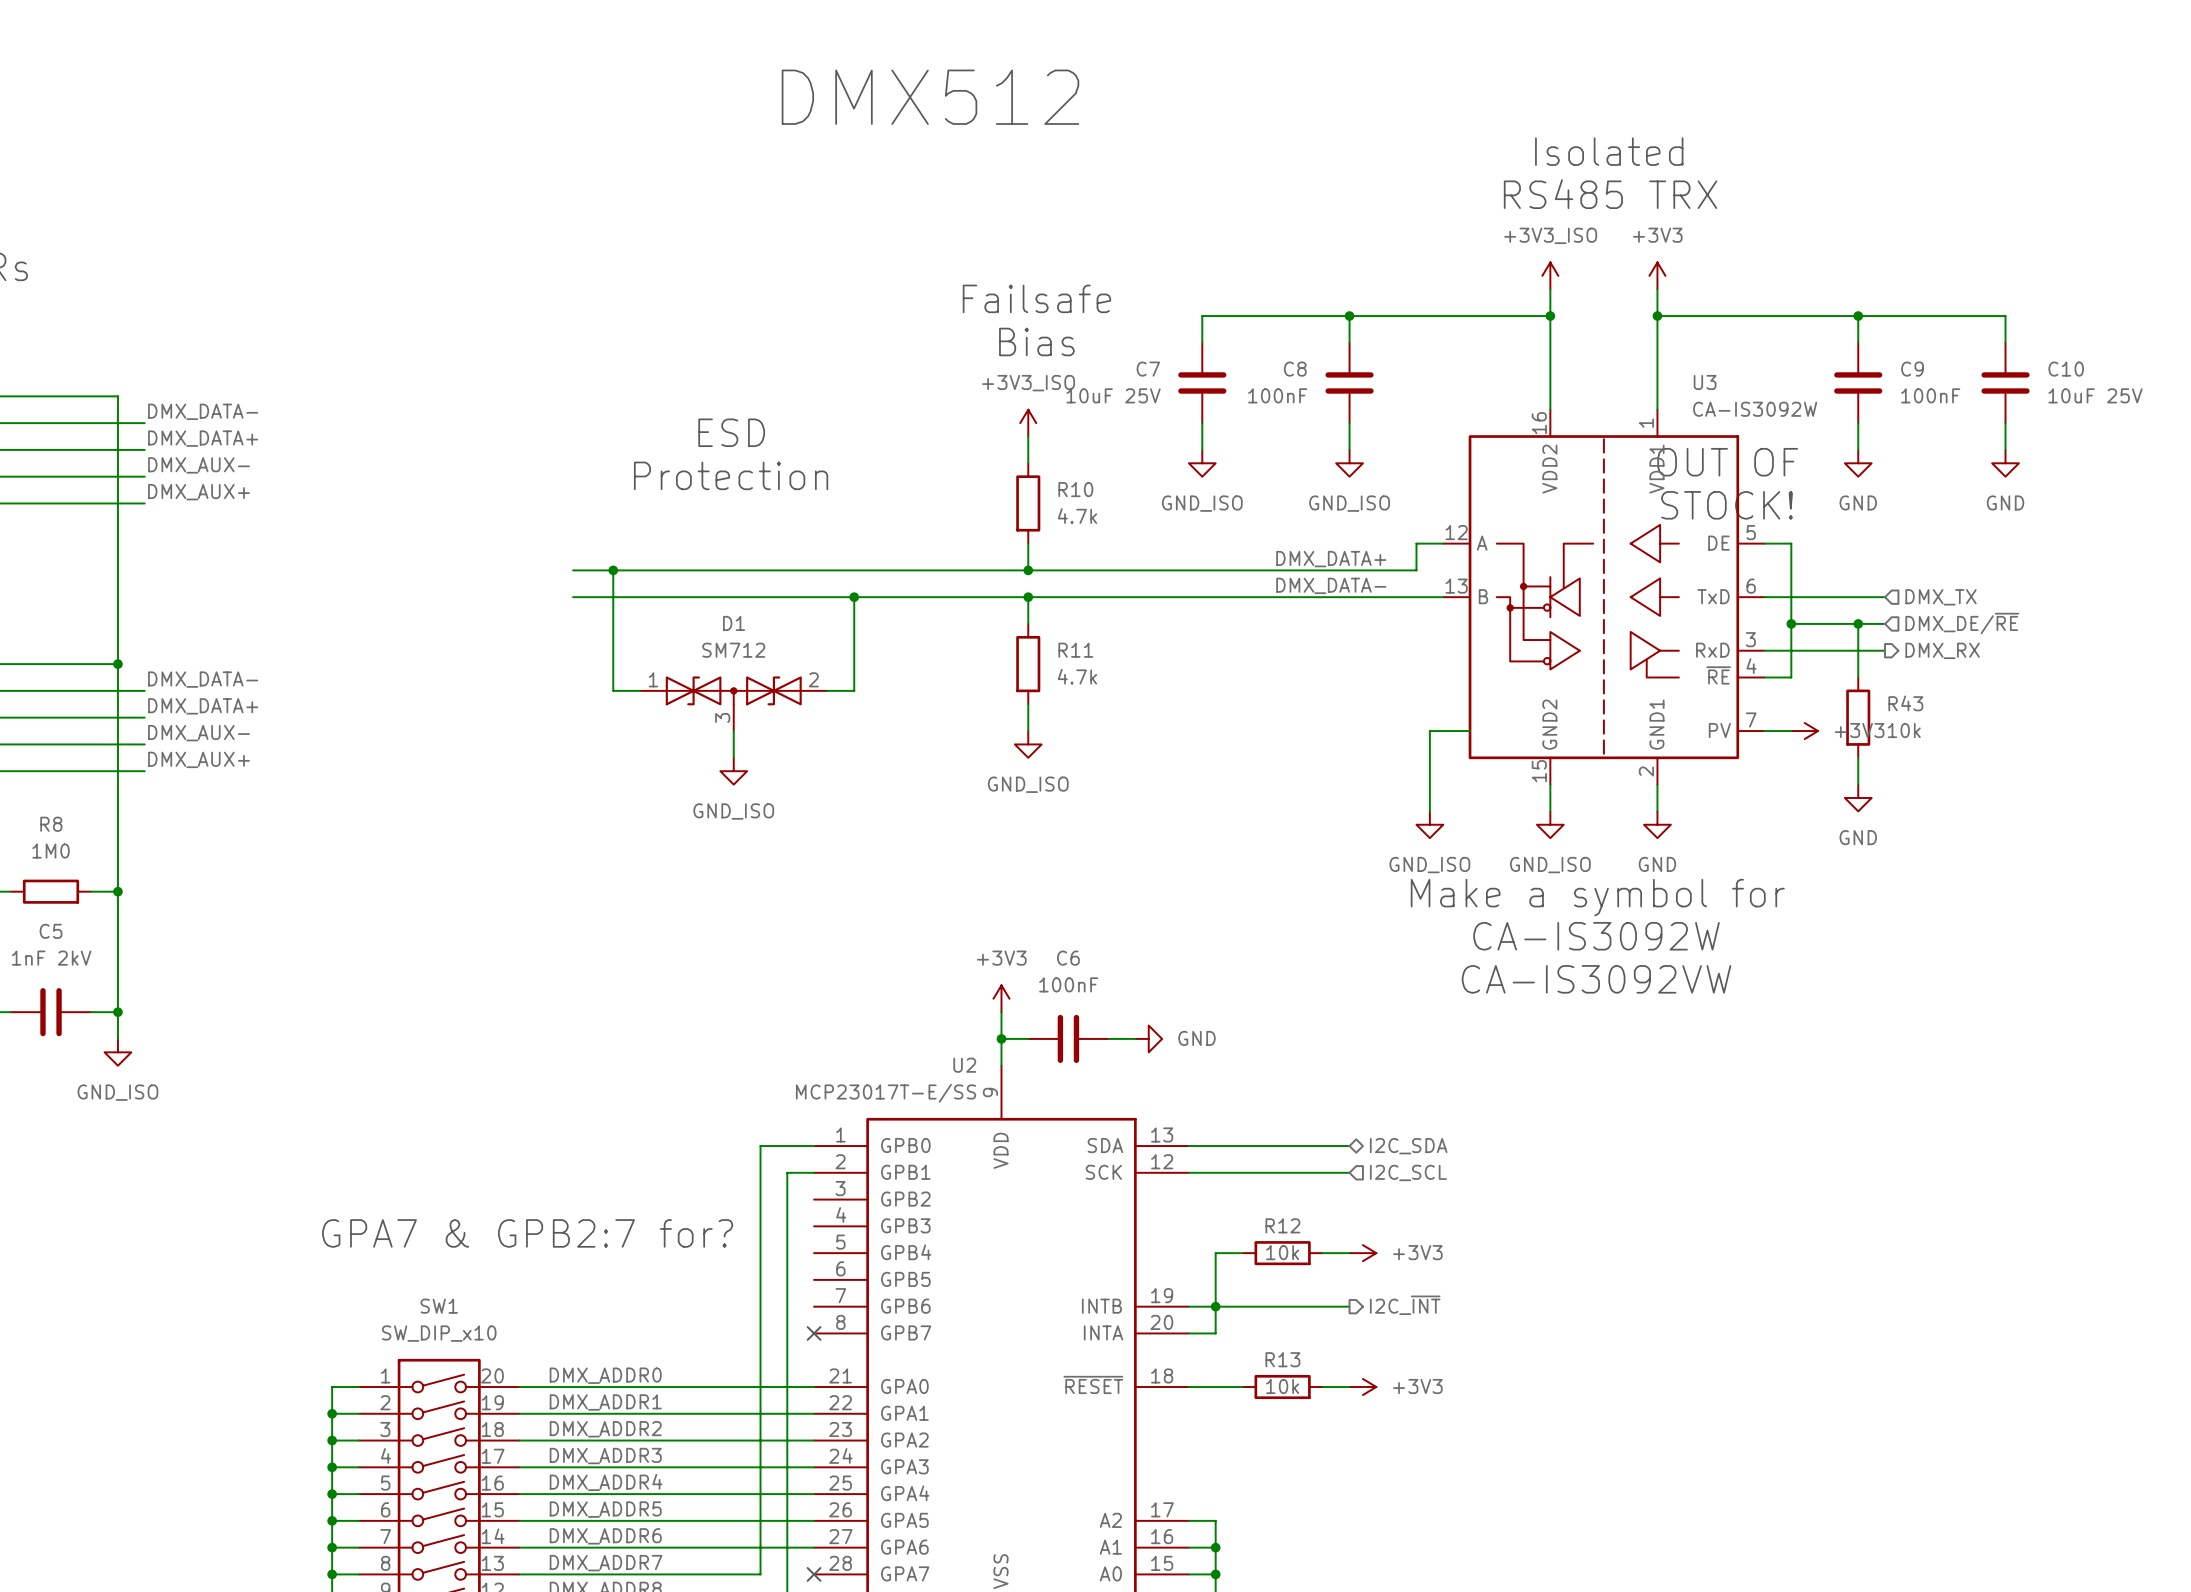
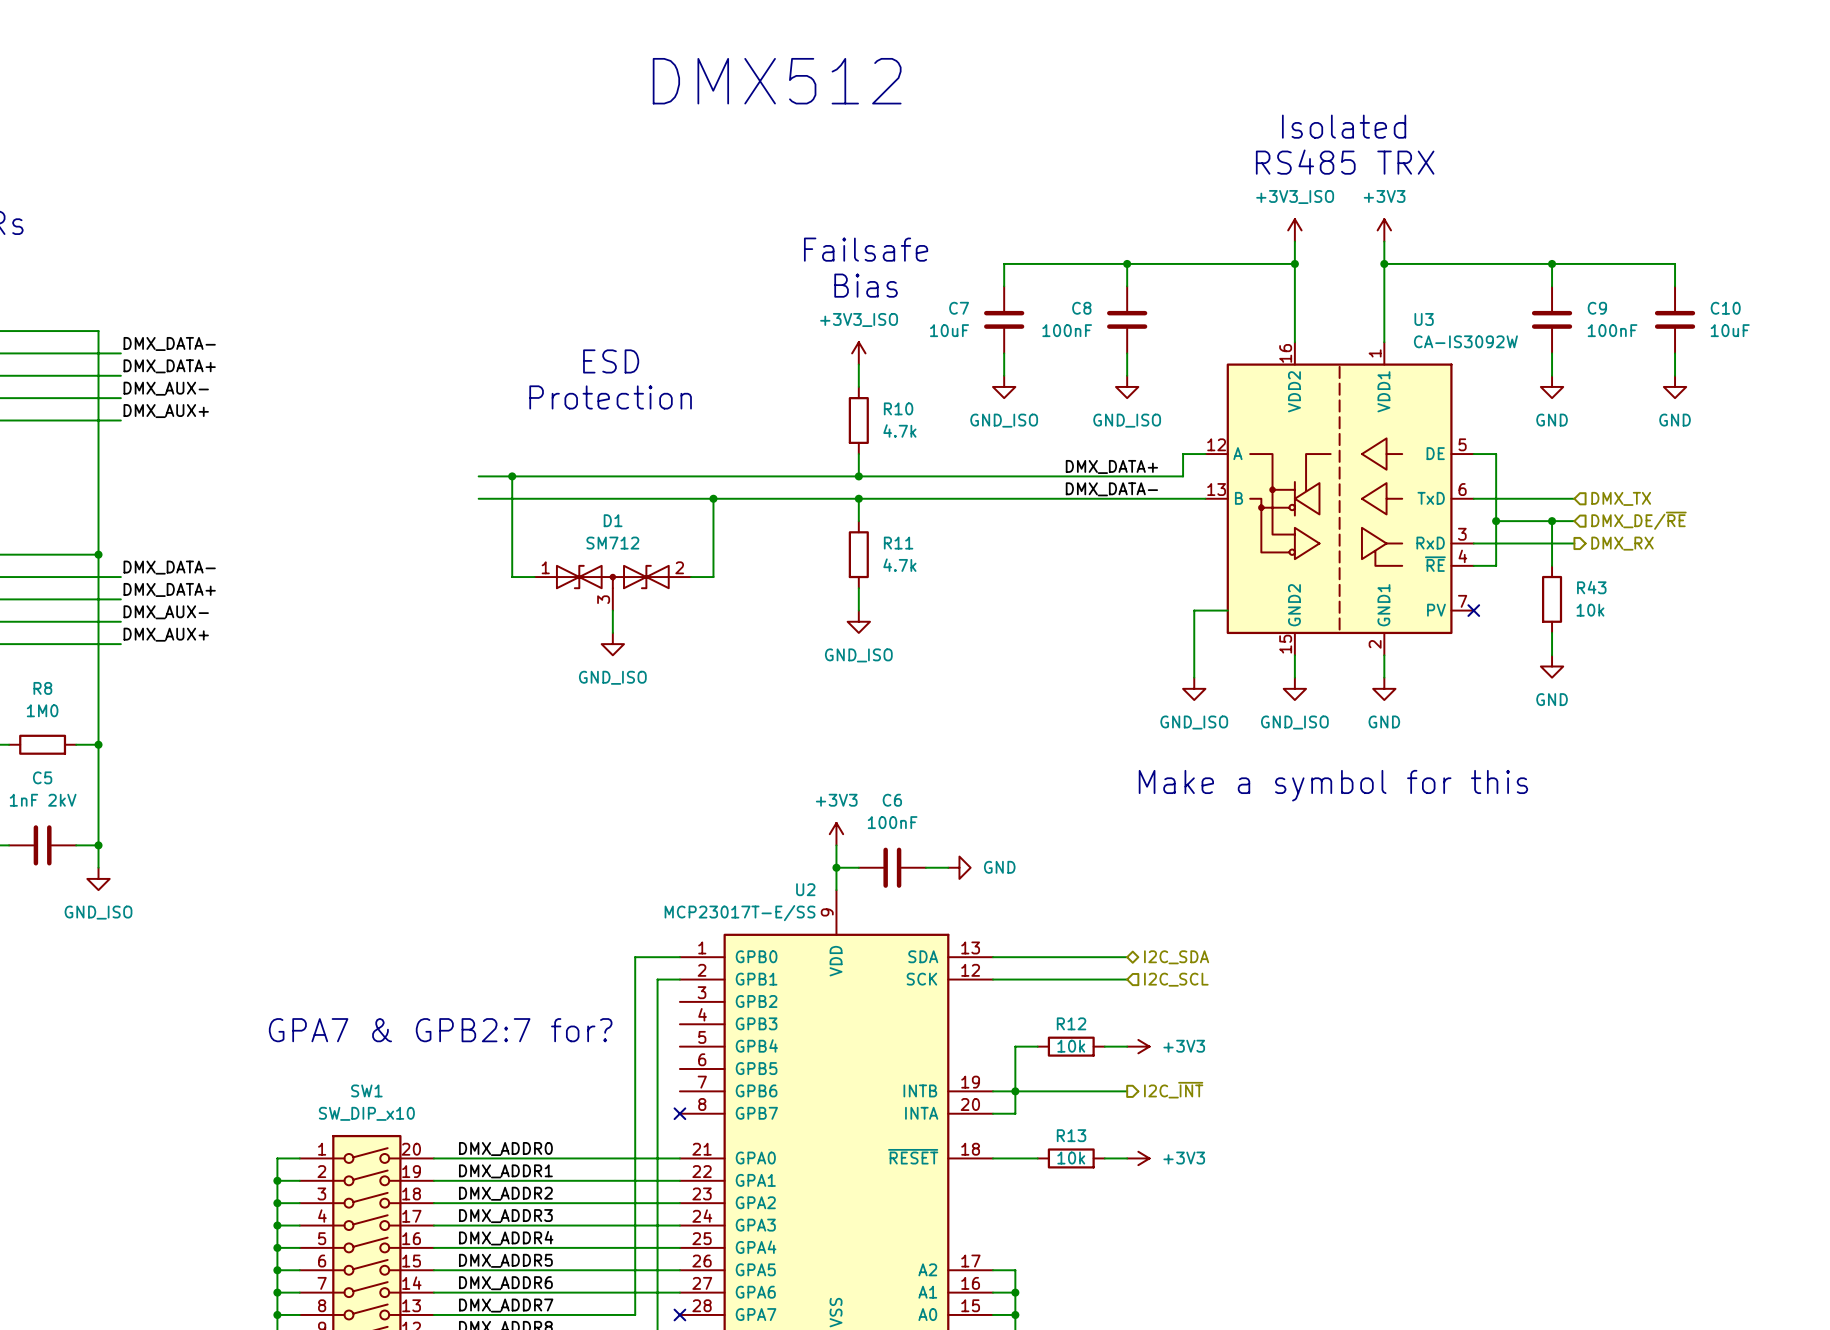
C7 value: 10uF 25V (1113, 395) -> 10uF (949, 330)
C10 value: 10uF 25V (2095, 395) -> 10uF (1730, 330)
text: OUT OF (1727, 462) -> none
text: STOCK! (1727, 505) -> none
wire: (1764, 731) (1791, 731) -> none
no-connect mark: none -> (1473, 610)
power symbol: +3V3 (1804, 731) -> none
text: Make a symbol for (1597, 897) -> none
text: CA-IS3092W (1596, 936) -> Make a symbol for this (1333, 785)
text: CA-IS3092VW (1596, 979) -> none

